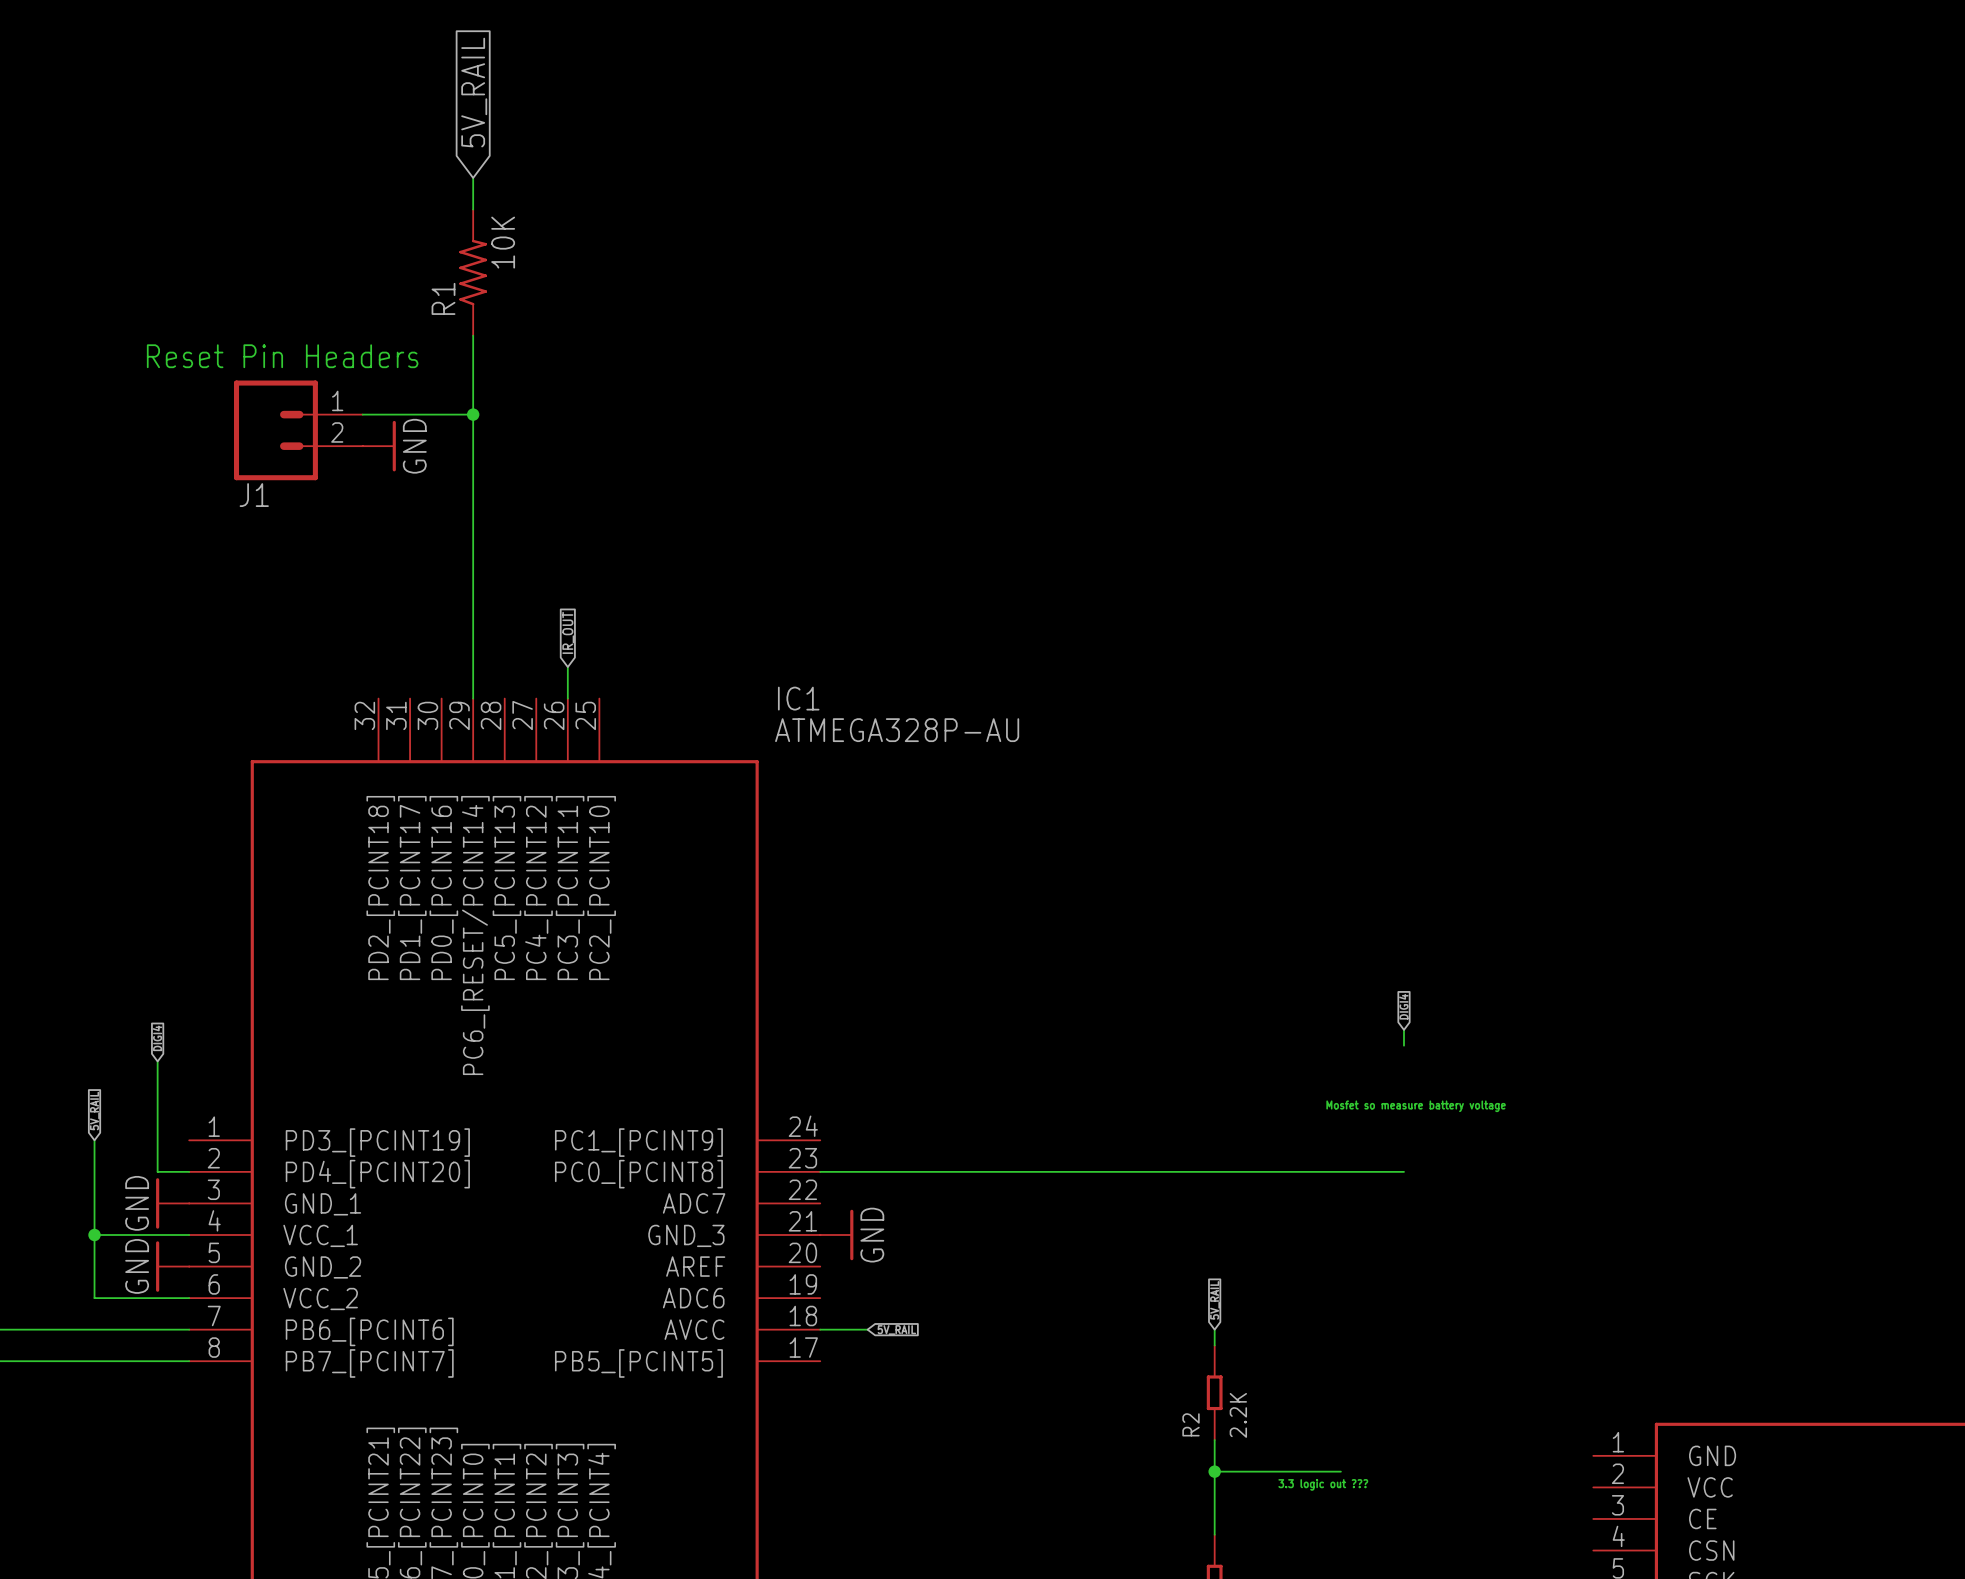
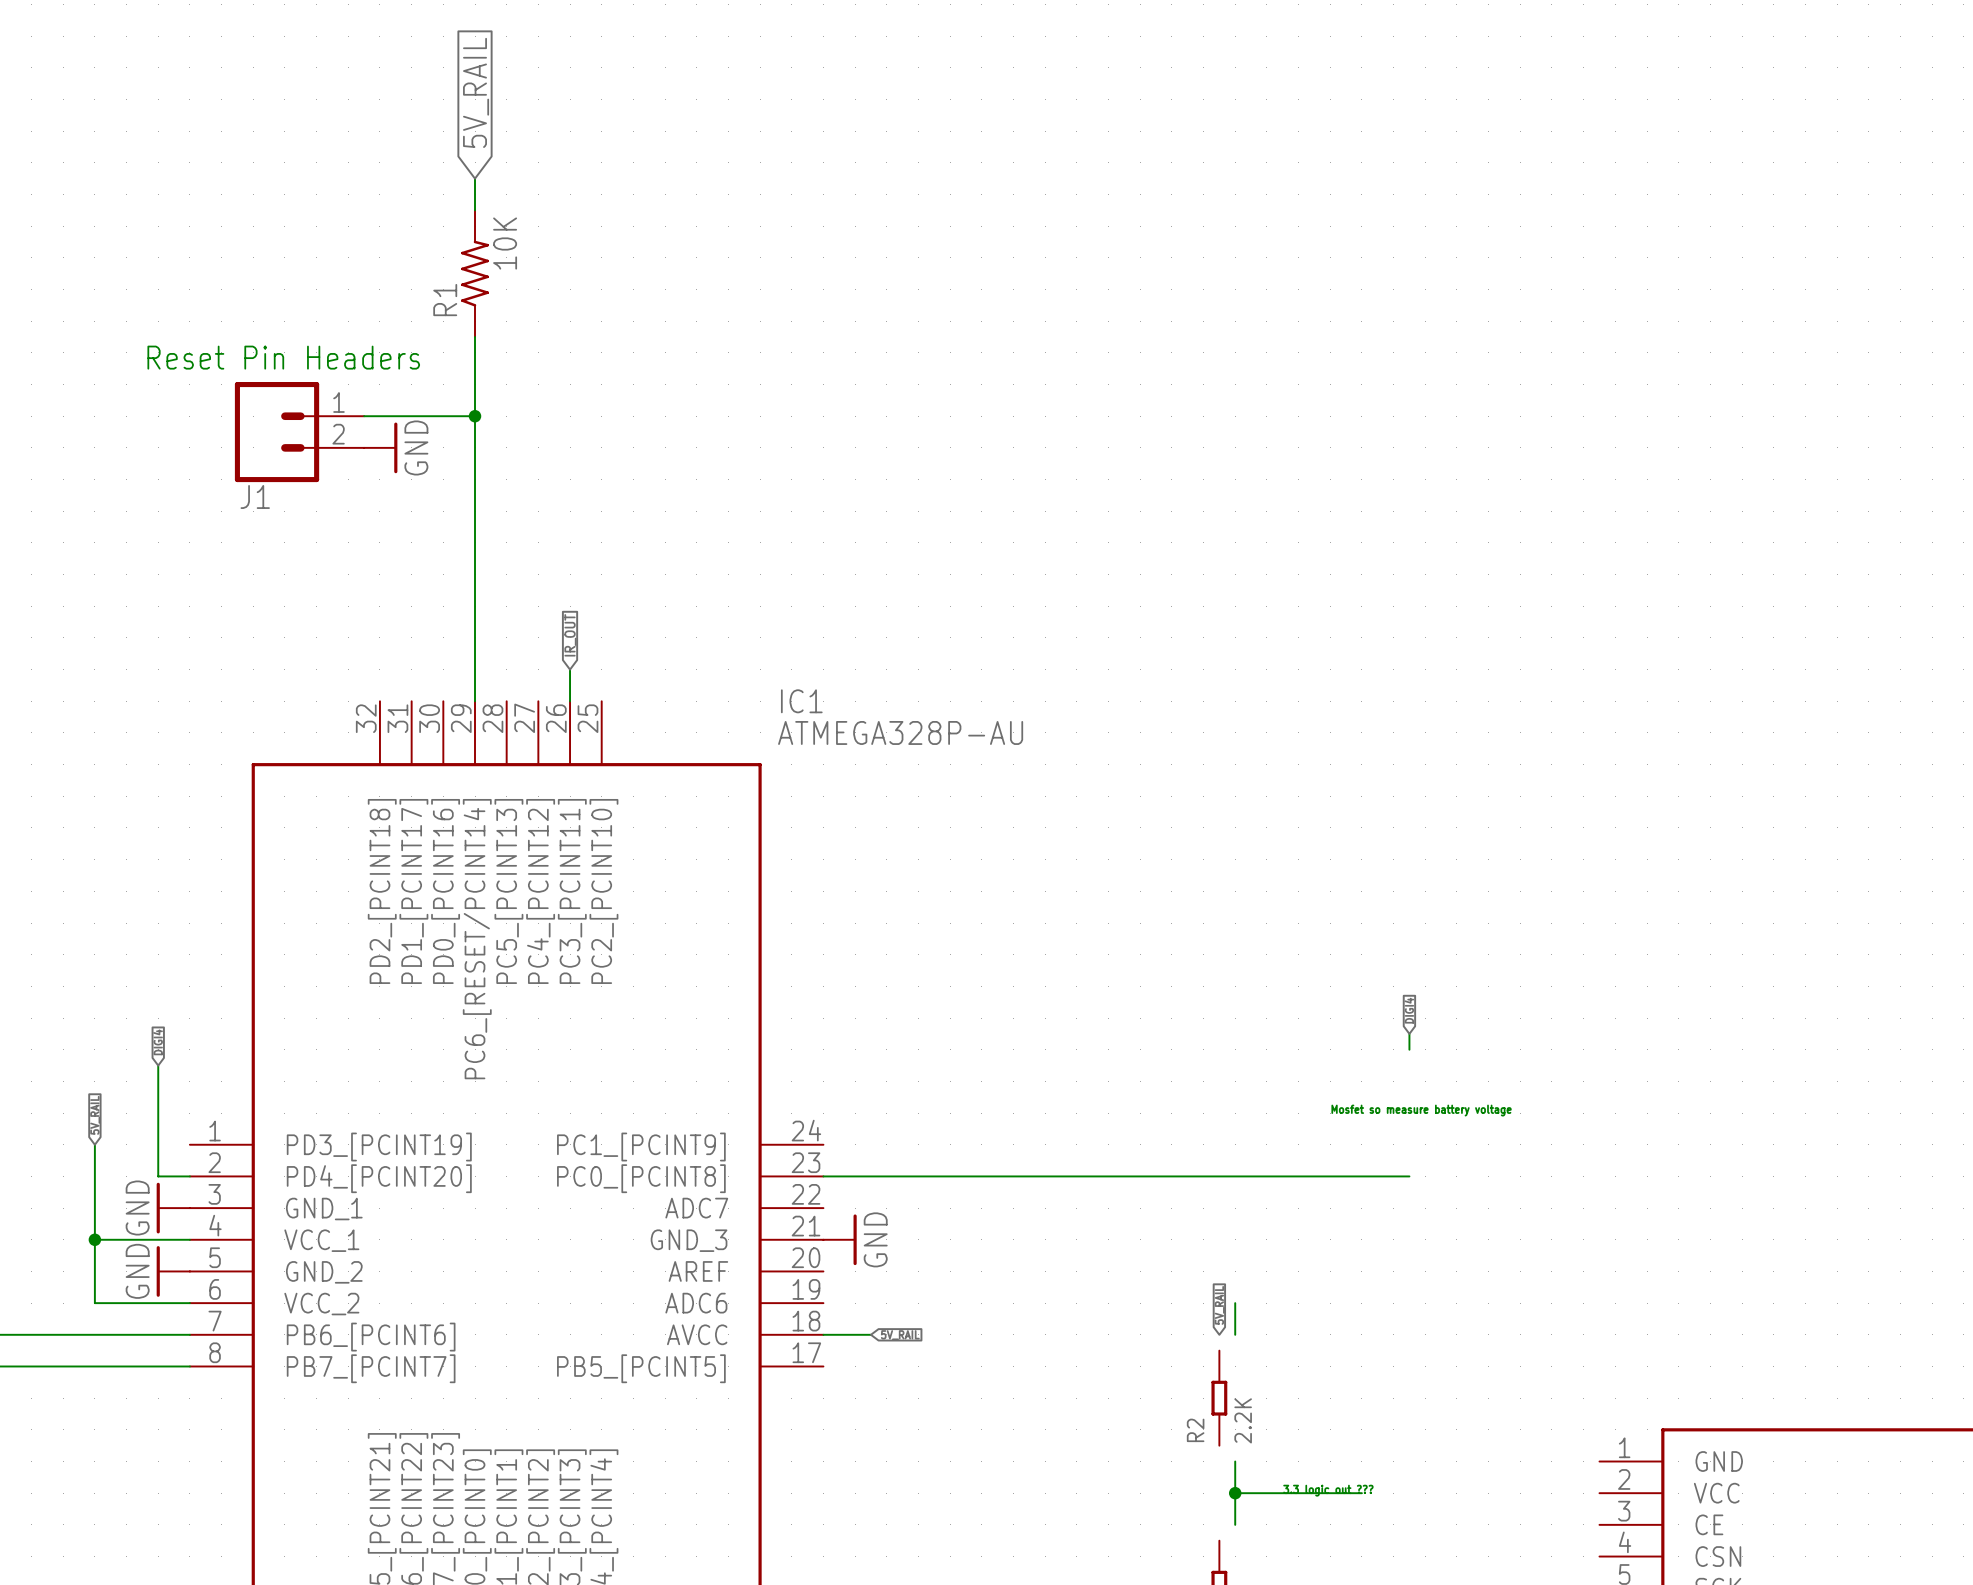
wire: none -> (1235, 1303) (1235, 1334)
wire: (1214, 1329) (1214, 1345) -> none
wire: (1214, 1440) (1214, 1534) -> none
wire: none -> (1235, 1461) (1235, 1524)
wire: (1214, 1471) (1340, 1471) -> (1235, 1493) (1361, 1493)
junction position: (1214, 1471) -> (1235, 1493)

